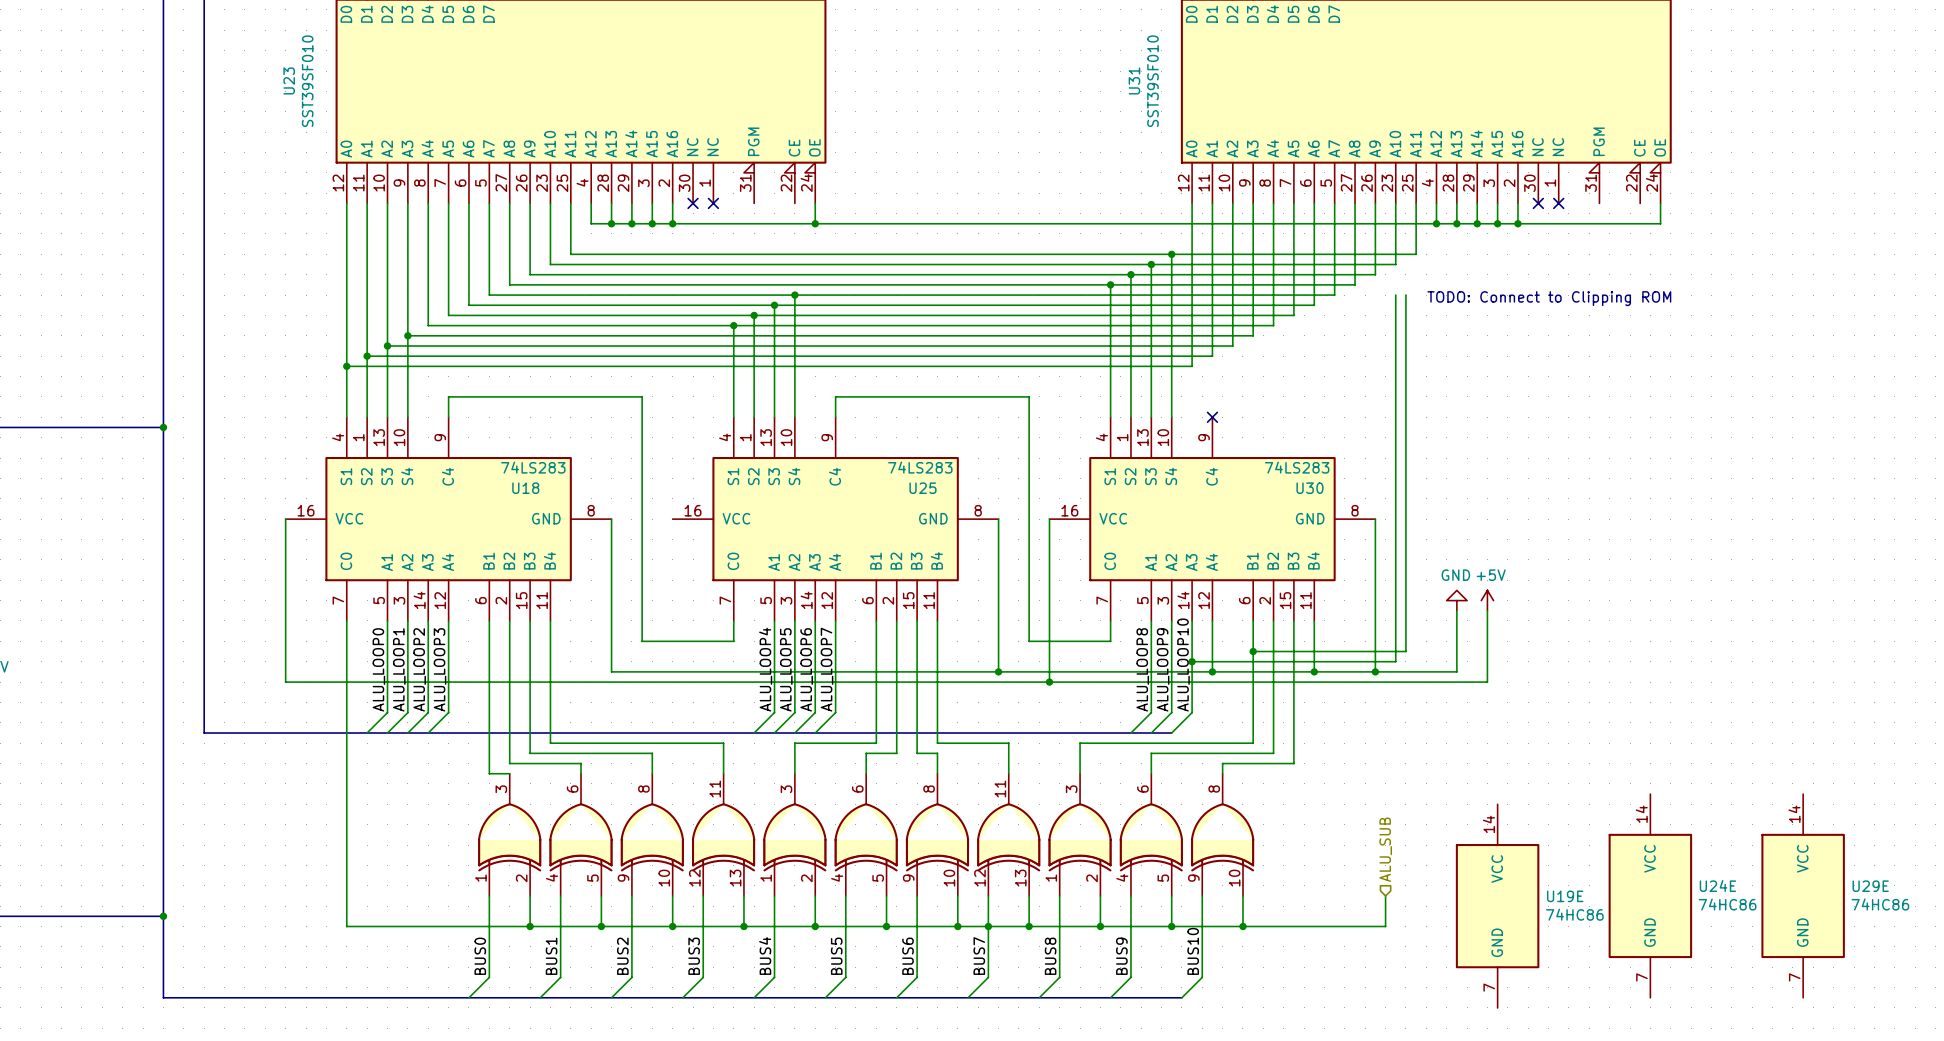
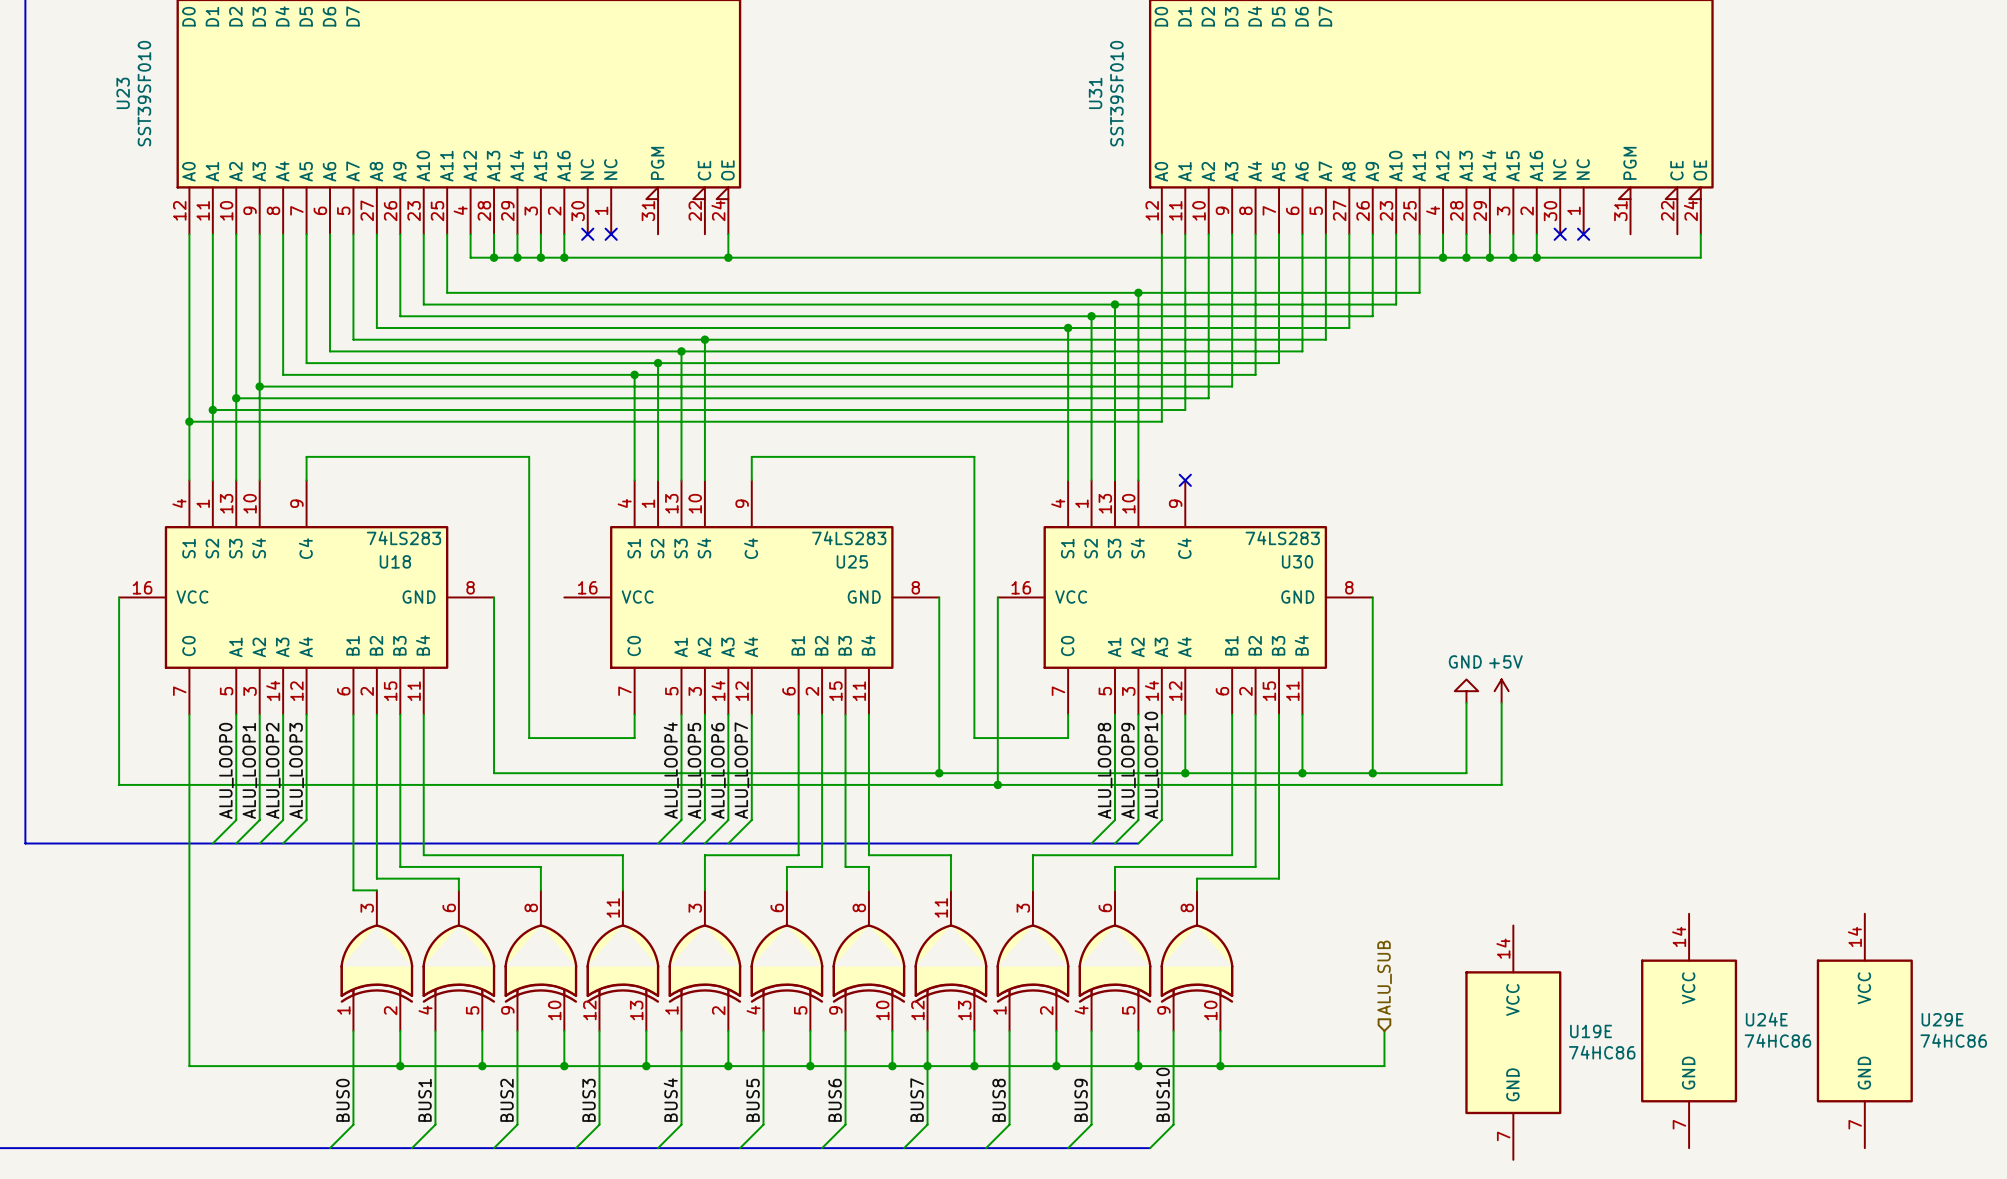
wire: (1395, 295) (1395, 661) (1192, 661) -> none
wire: (1405, 295) (1405, 651) (1253, 651) -> none
text: TODO: Connect to Clipping ROM (1549, 298) -> none
junction: (1253, 651) -> none
junction: (1192, 661) -> none

